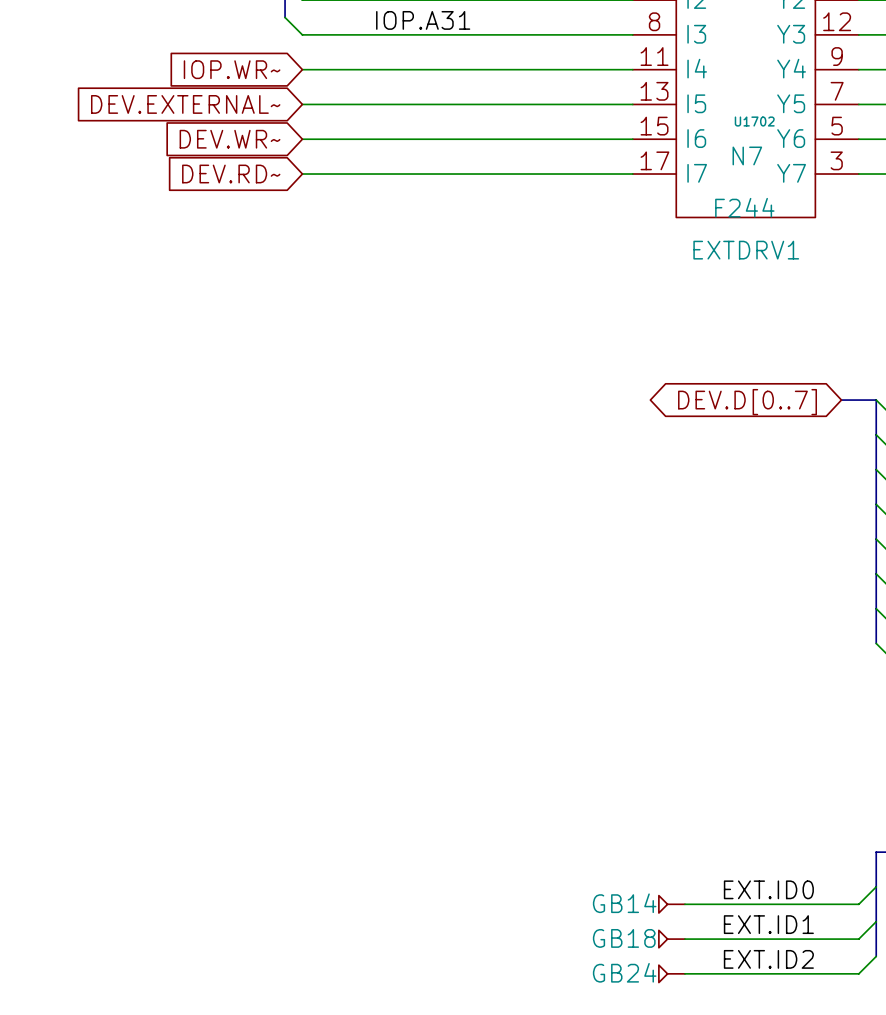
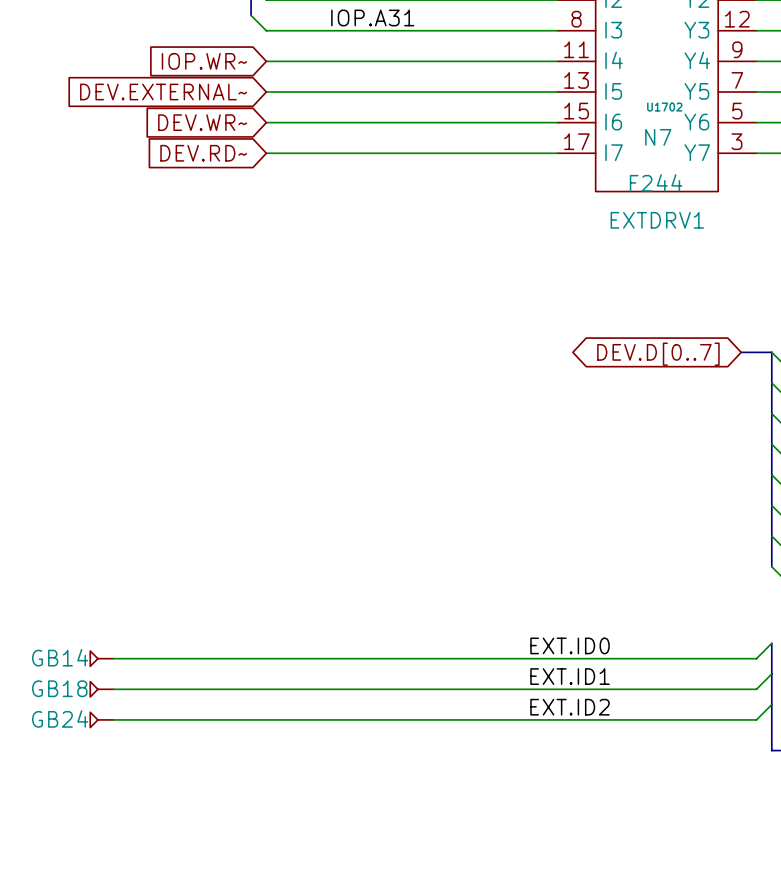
wire: none -> (771, 643) (756, 658) (113, 658)
label: none -> EXT.ID0 (570, 645)
wire: none -> (771, 673) (756, 689) (113, 689)
label: none -> EXT.ID1 (570, 676)
wire: none -> (771, 704) (756, 719) (113, 719)
label: none -> EXT.ID2 (570, 707)
bus: (876, 852) (876, 956) -> (771, 750) (771, 643)
wire: (876, 886) (858, 904) (684, 904) -> none
label: EXT.ID0 (768, 889) -> none
GB14 position: (671, 904) -> (101, 658)
wire: (876, 921) (858, 939) (684, 939) -> none
label: EXT.ID1 (768, 924) -> none
GB18 position: (671, 939) -> (101, 689)
wire: (876, 956) (858, 973) (684, 973) -> none
label: EXT.ID2 (768, 959) -> none
GB24 position: (671, 973) -> (101, 719)

